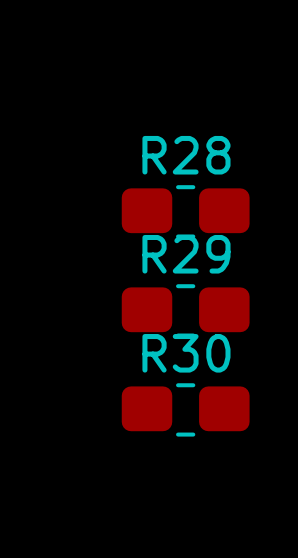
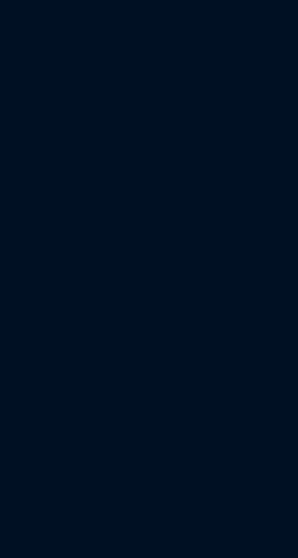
R28: (185, 211) -> none
R29: (185, 310) -> none
R30: (185, 409) -> none

